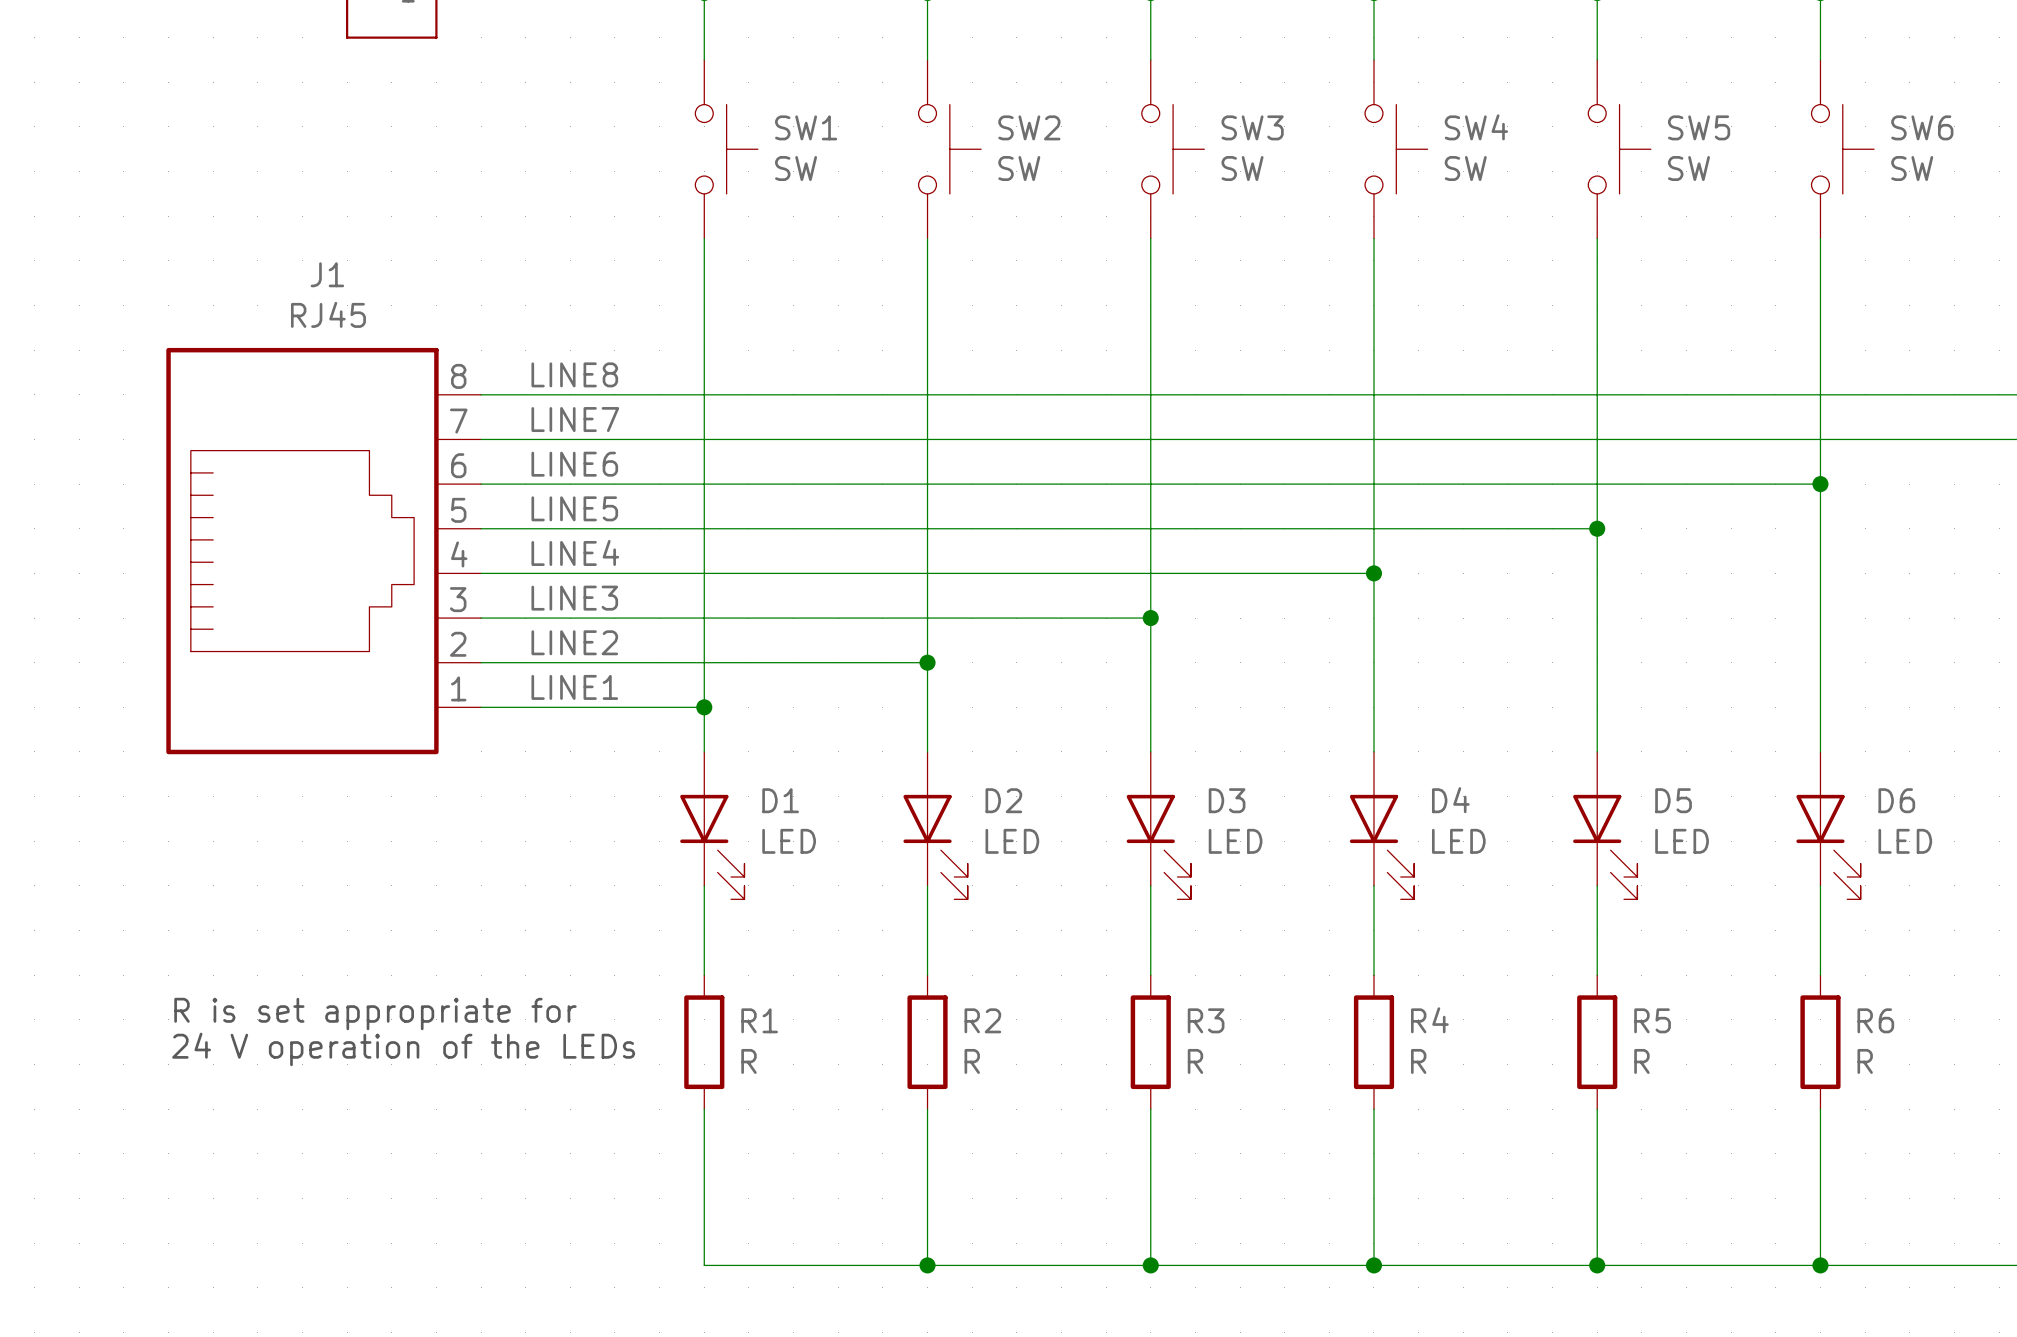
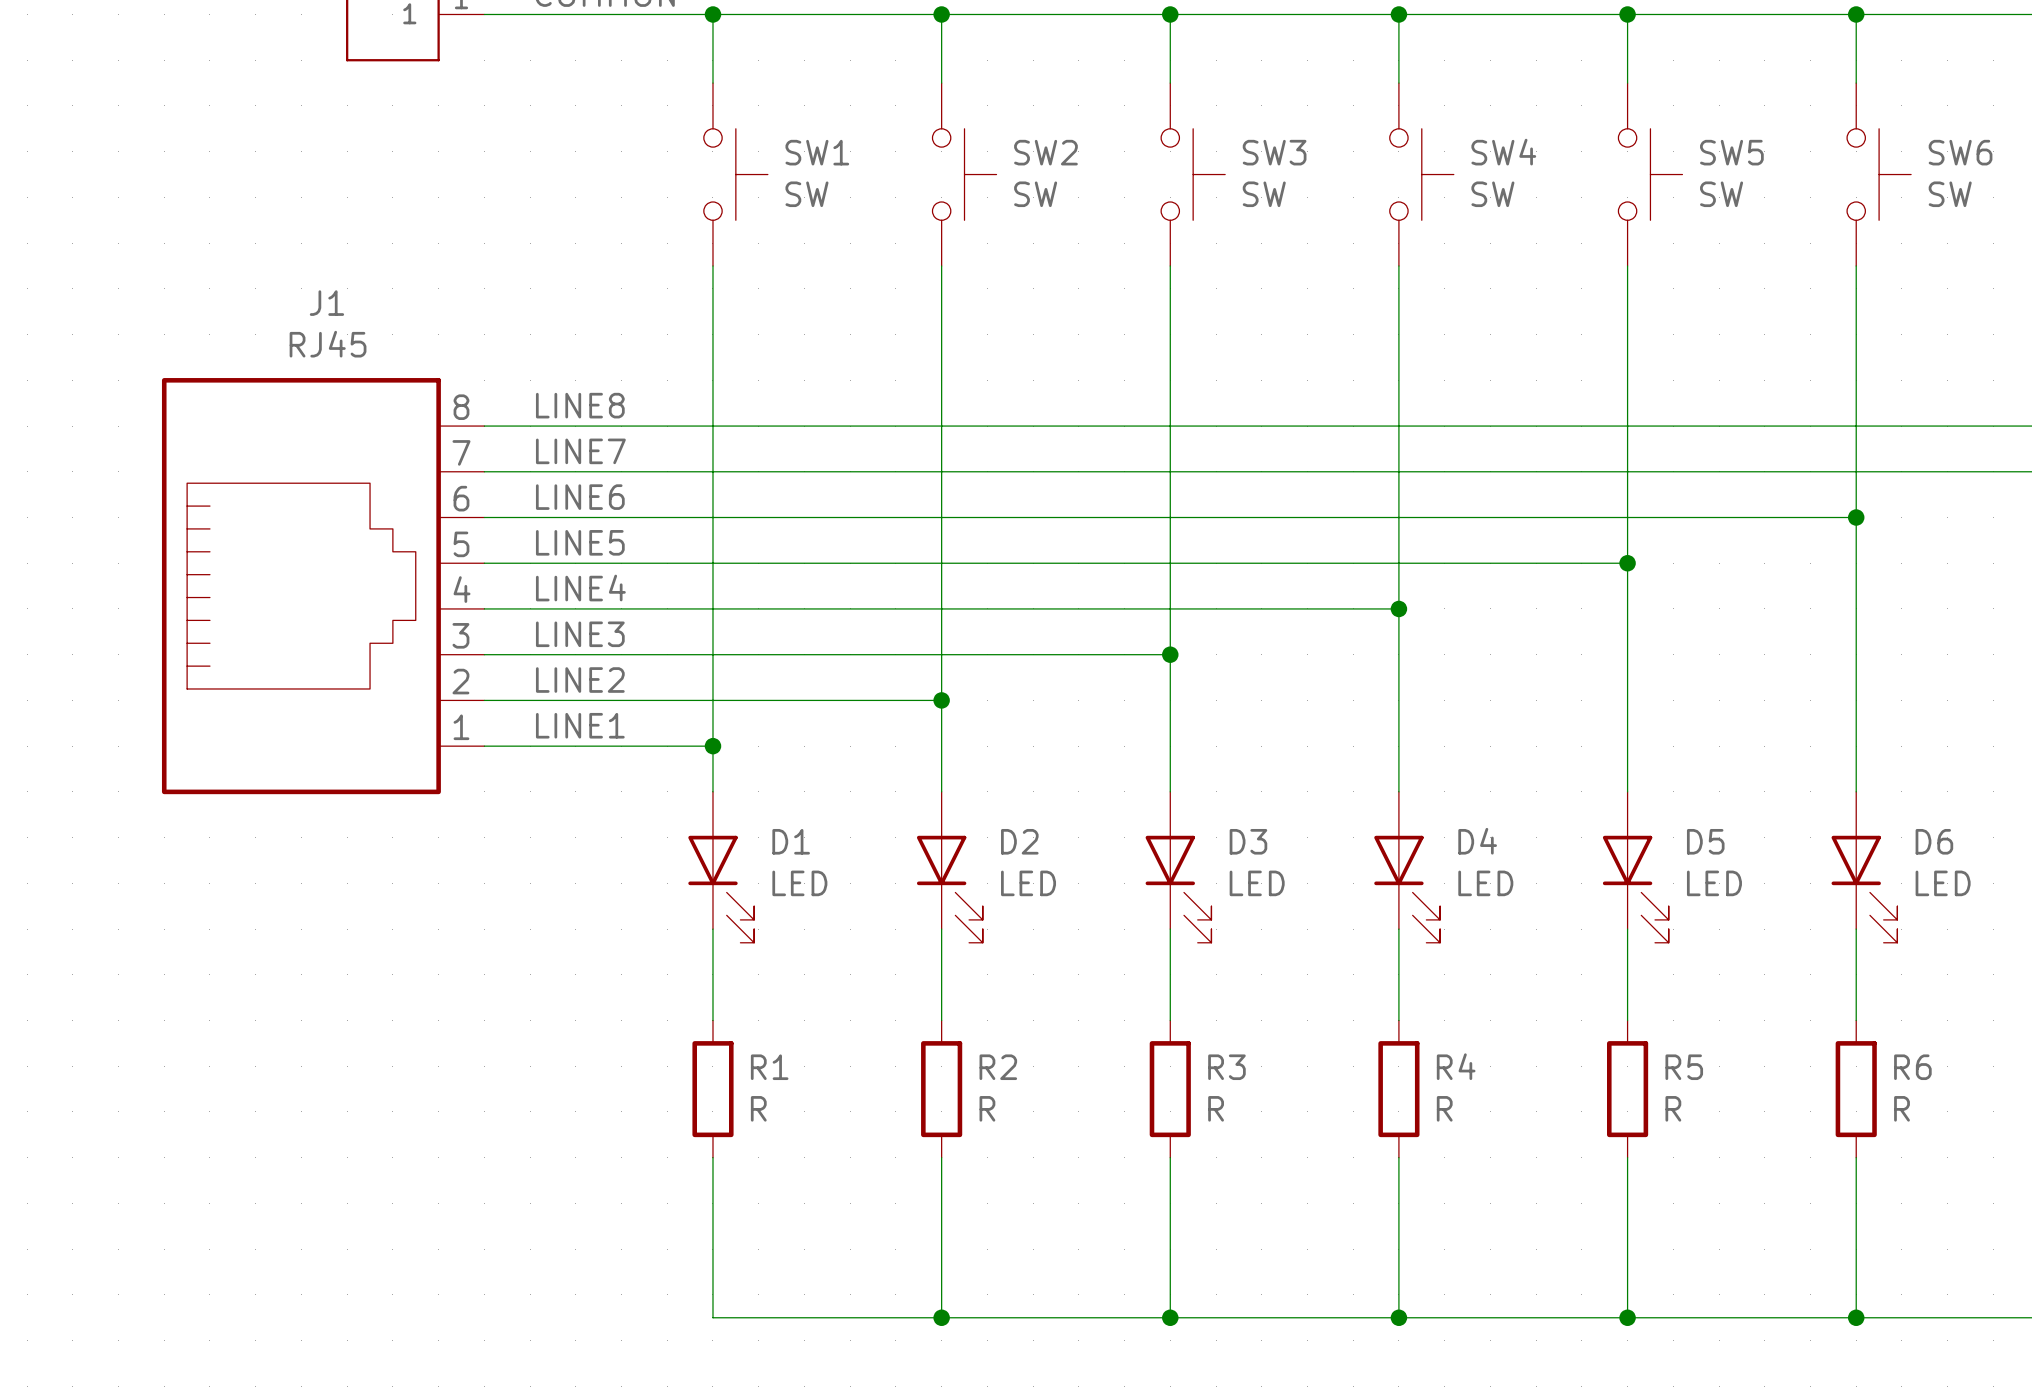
text: R is set appropriate for (375, 1014) -> none
text: 24 V operation of the LEDs (403, 1049) -> none

